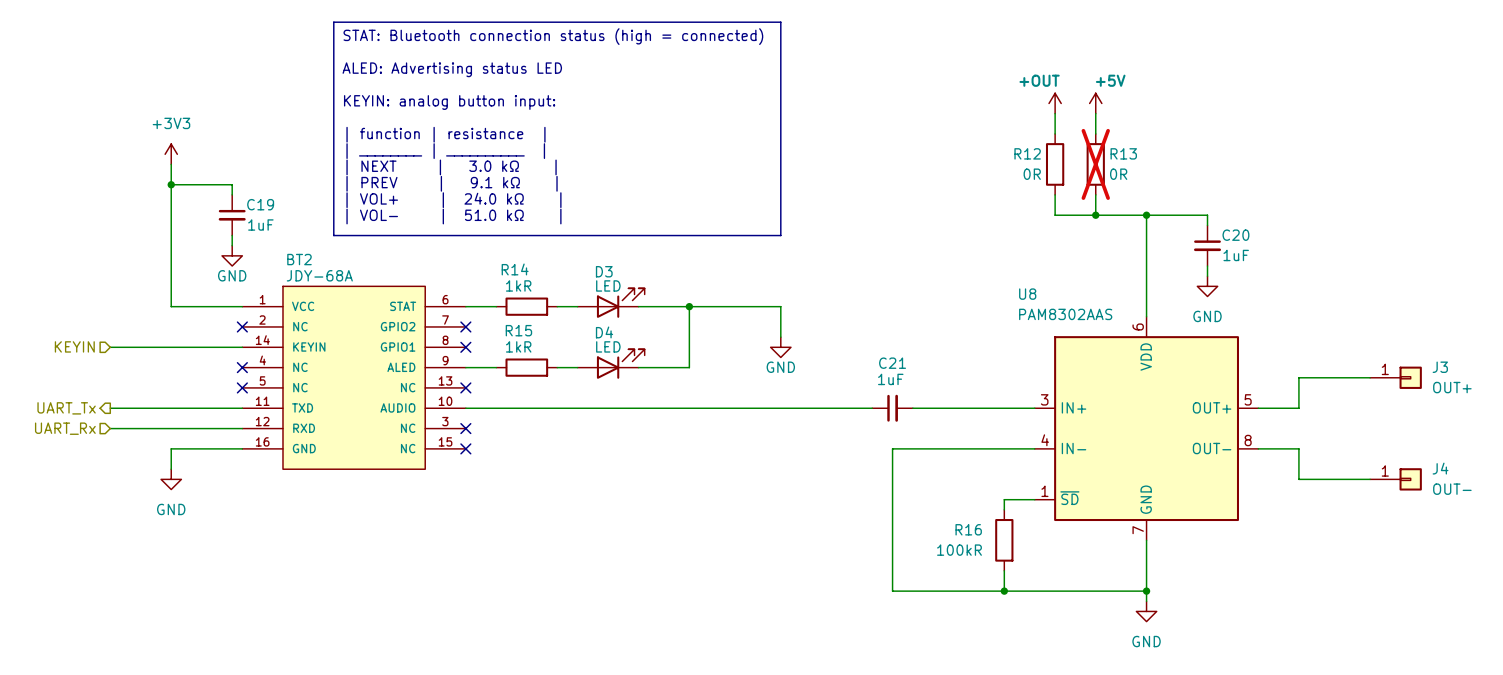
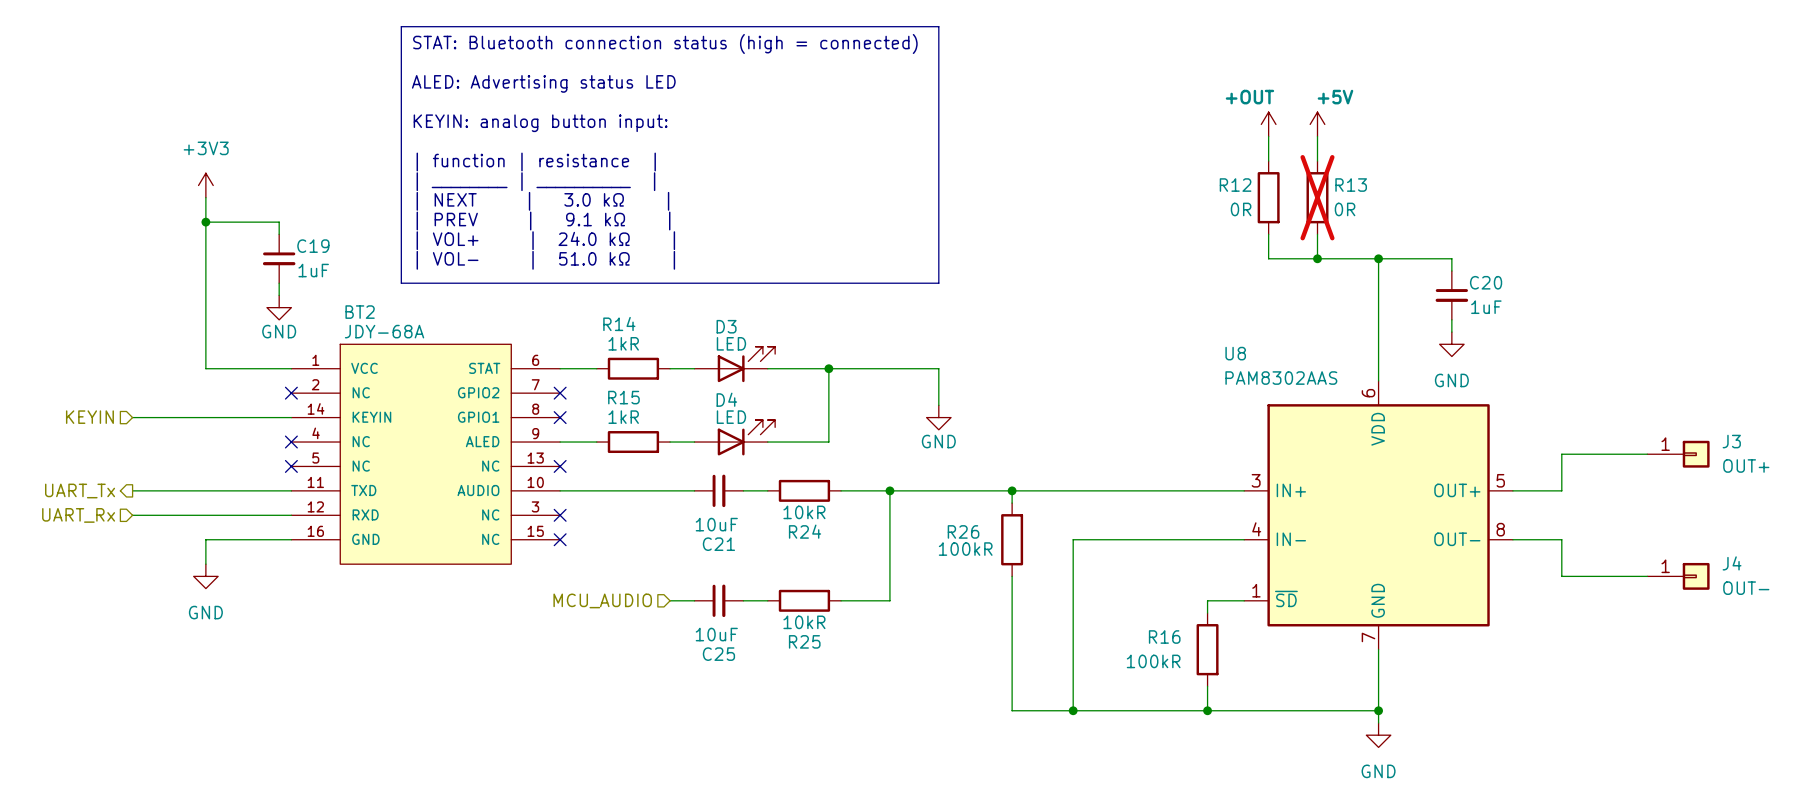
C21 name position: C21 (892, 363) -> C21 (718, 544)
C21 value: 1uF (890, 379) -> 10uF (716, 524)
wire: (638, 408) (699, 408) -> none
R24: none -> 10kR (804, 490)
wire: none -> (889, 490) (889, 600) (841, 600)
junction: none -> (889, 490)
wire: none -> (1012, 490) (1012, 503)
junction: none -> (1012, 490)
C21 position: (892, 408) -> (718, 490)
R26: none -> 100kR (1012, 539)
wire: none -> (1012, 576) (1012, 710) (1073, 710)
hierarchical label: none -> MCU_AUDIO (602, 600)
wire: none -> (670, 600) (694, 600)
C25: none -> 10uF (718, 600)
wire: none -> (743, 600) (767, 600)
R25: none -> 10kR (804, 600)
junction: none -> (1073, 710)

